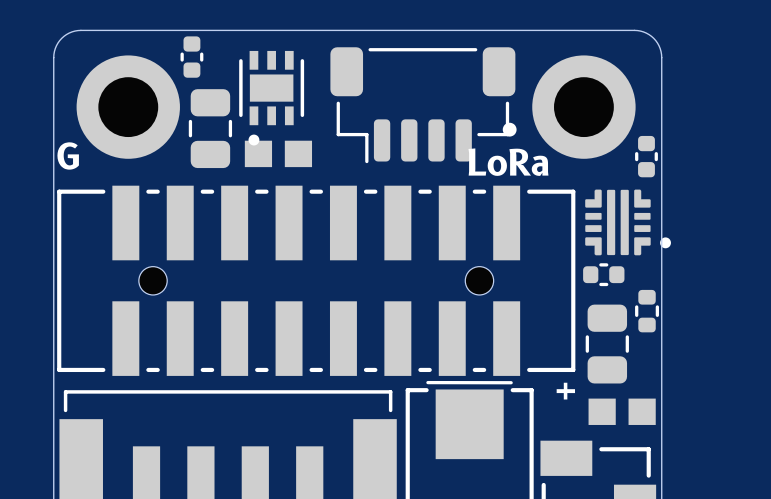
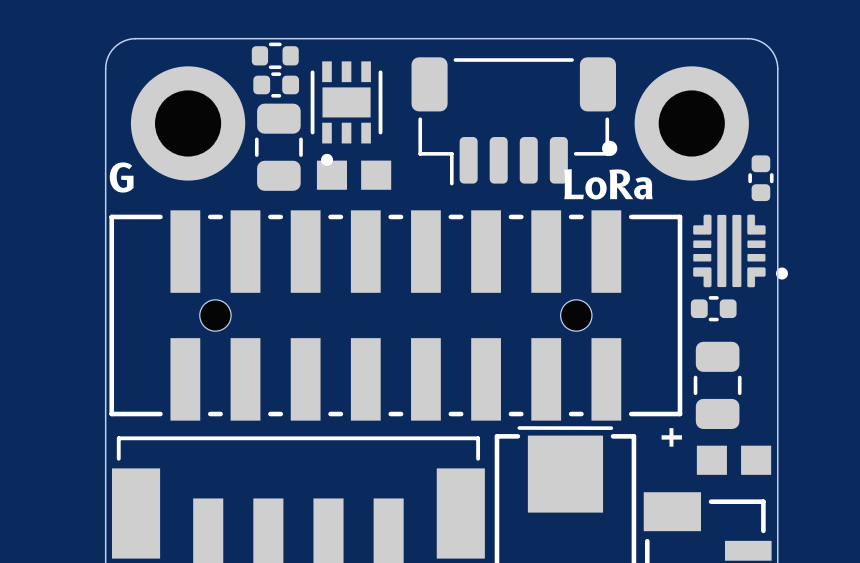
part rotation: 0° (191, 57) -> 90° clockwise (276, 84)
part rotation: 0° (647, 311) -> 90° clockwise (275, 55)
part position: (647, 311) -> (275, 55)

